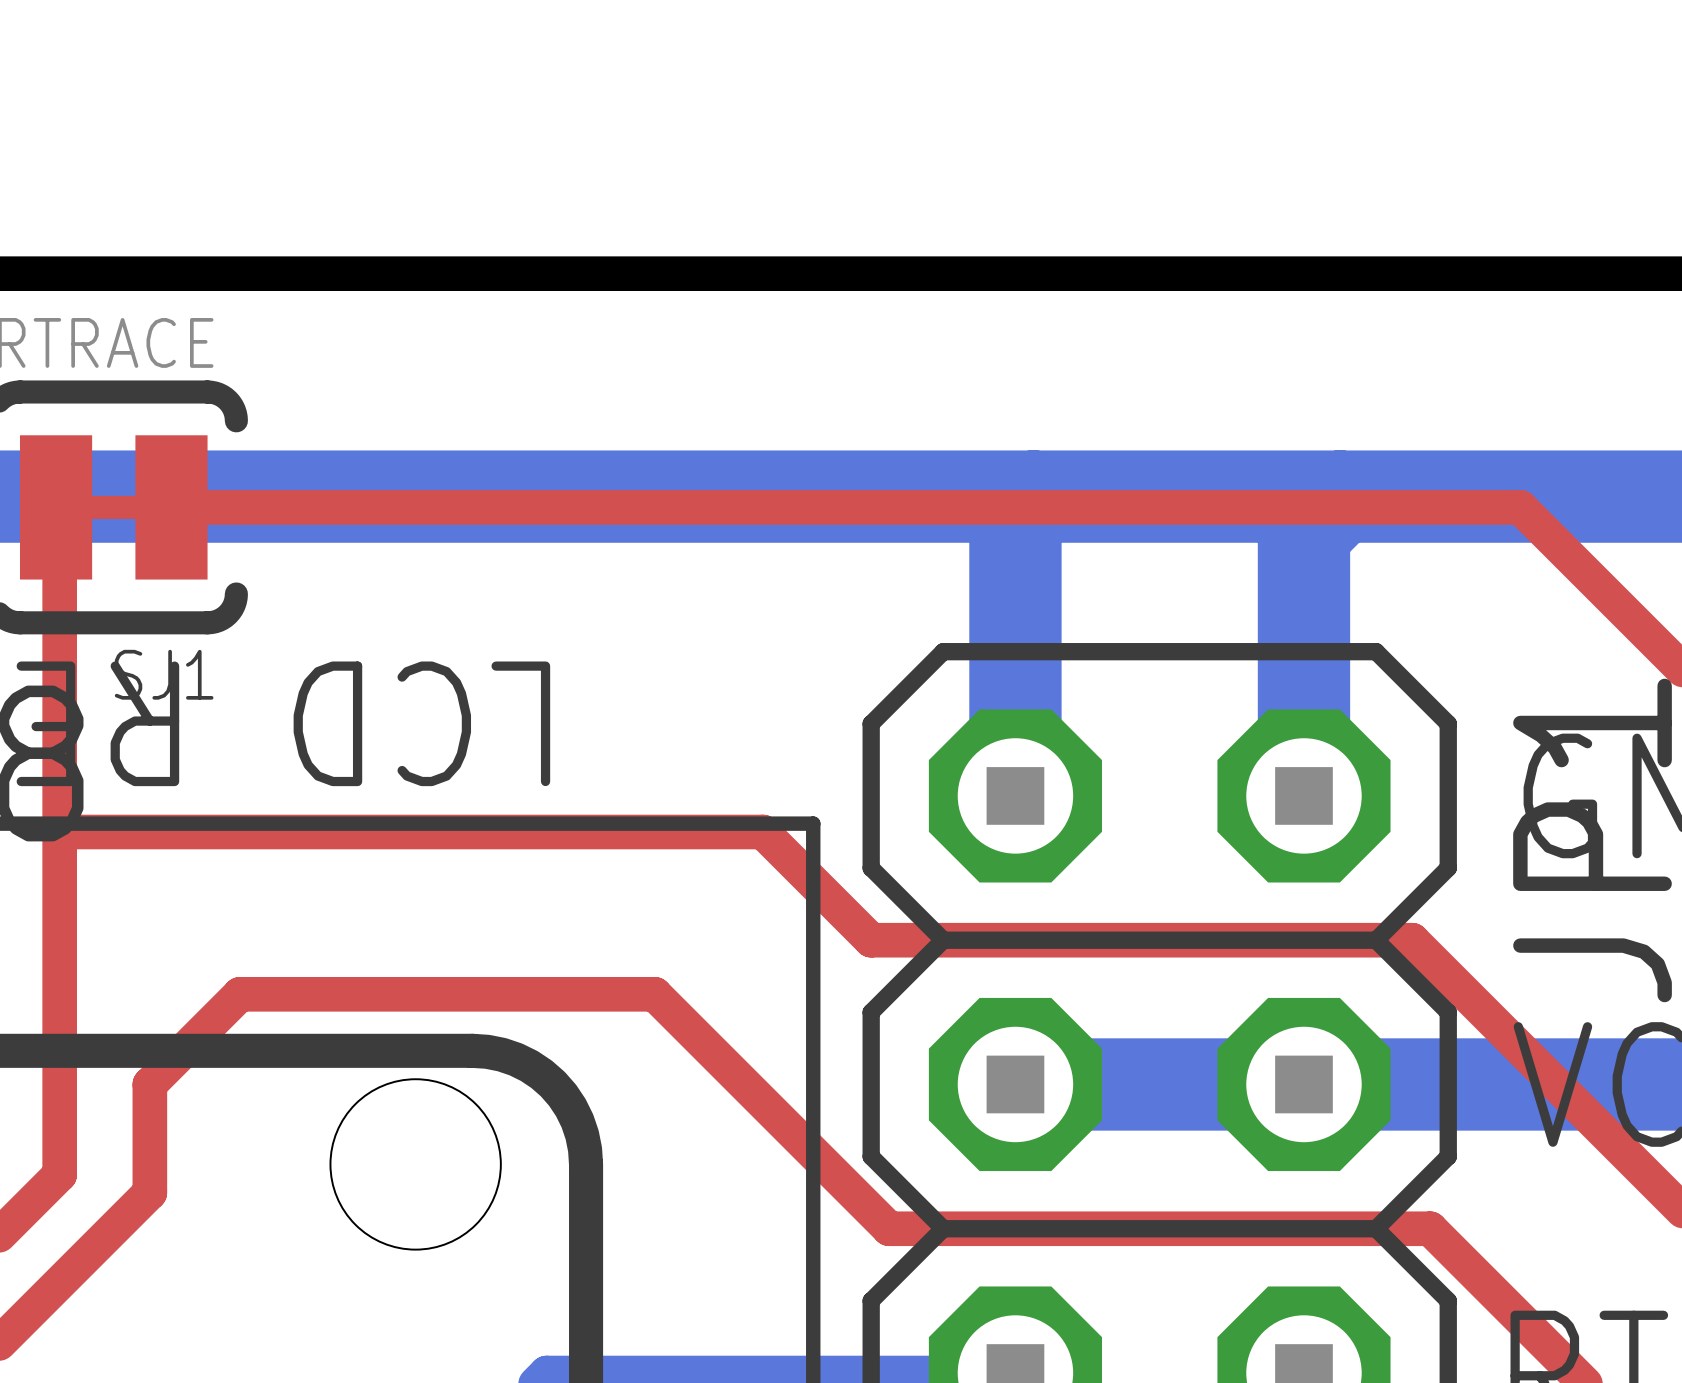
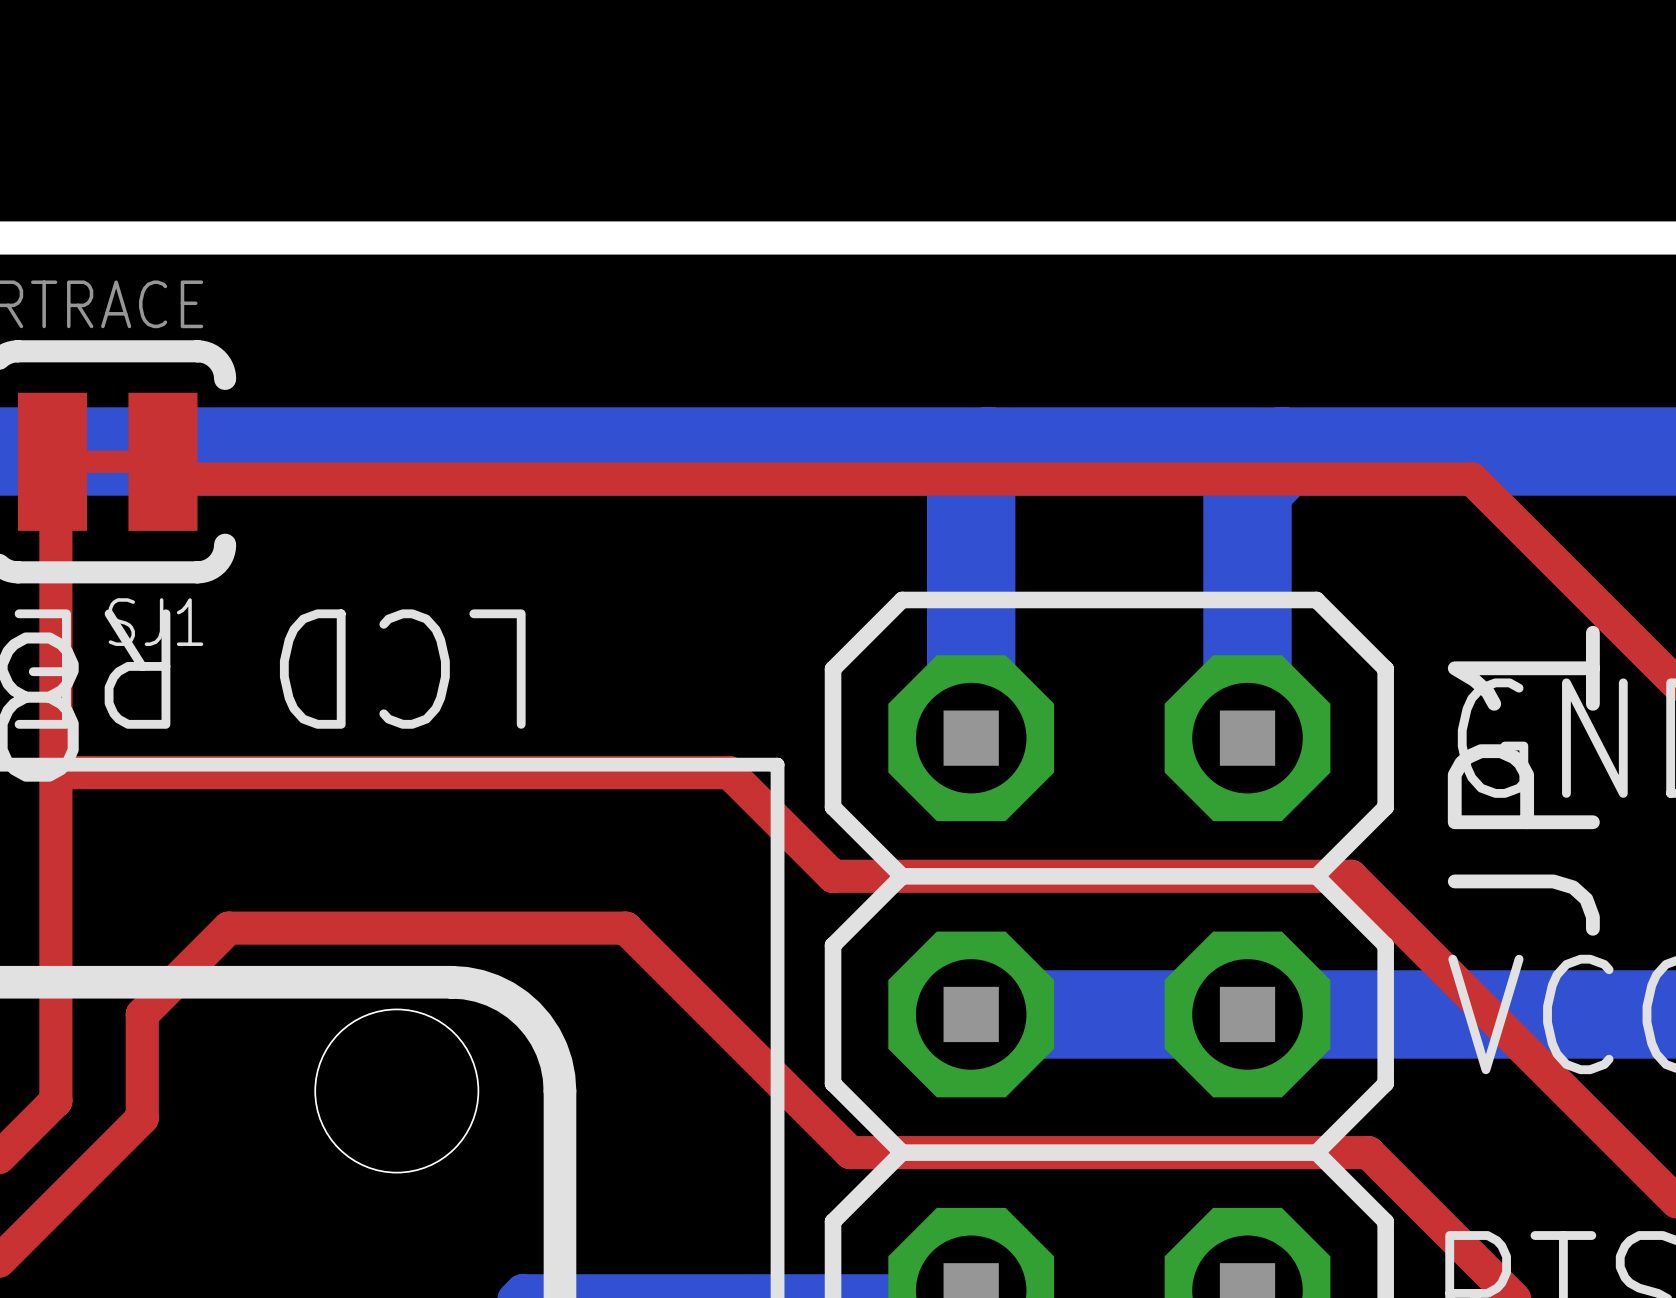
top track: (171, 507) (1520, 507) (1538, 525) -> (162, 461) (162, 479) (1472, 479)

